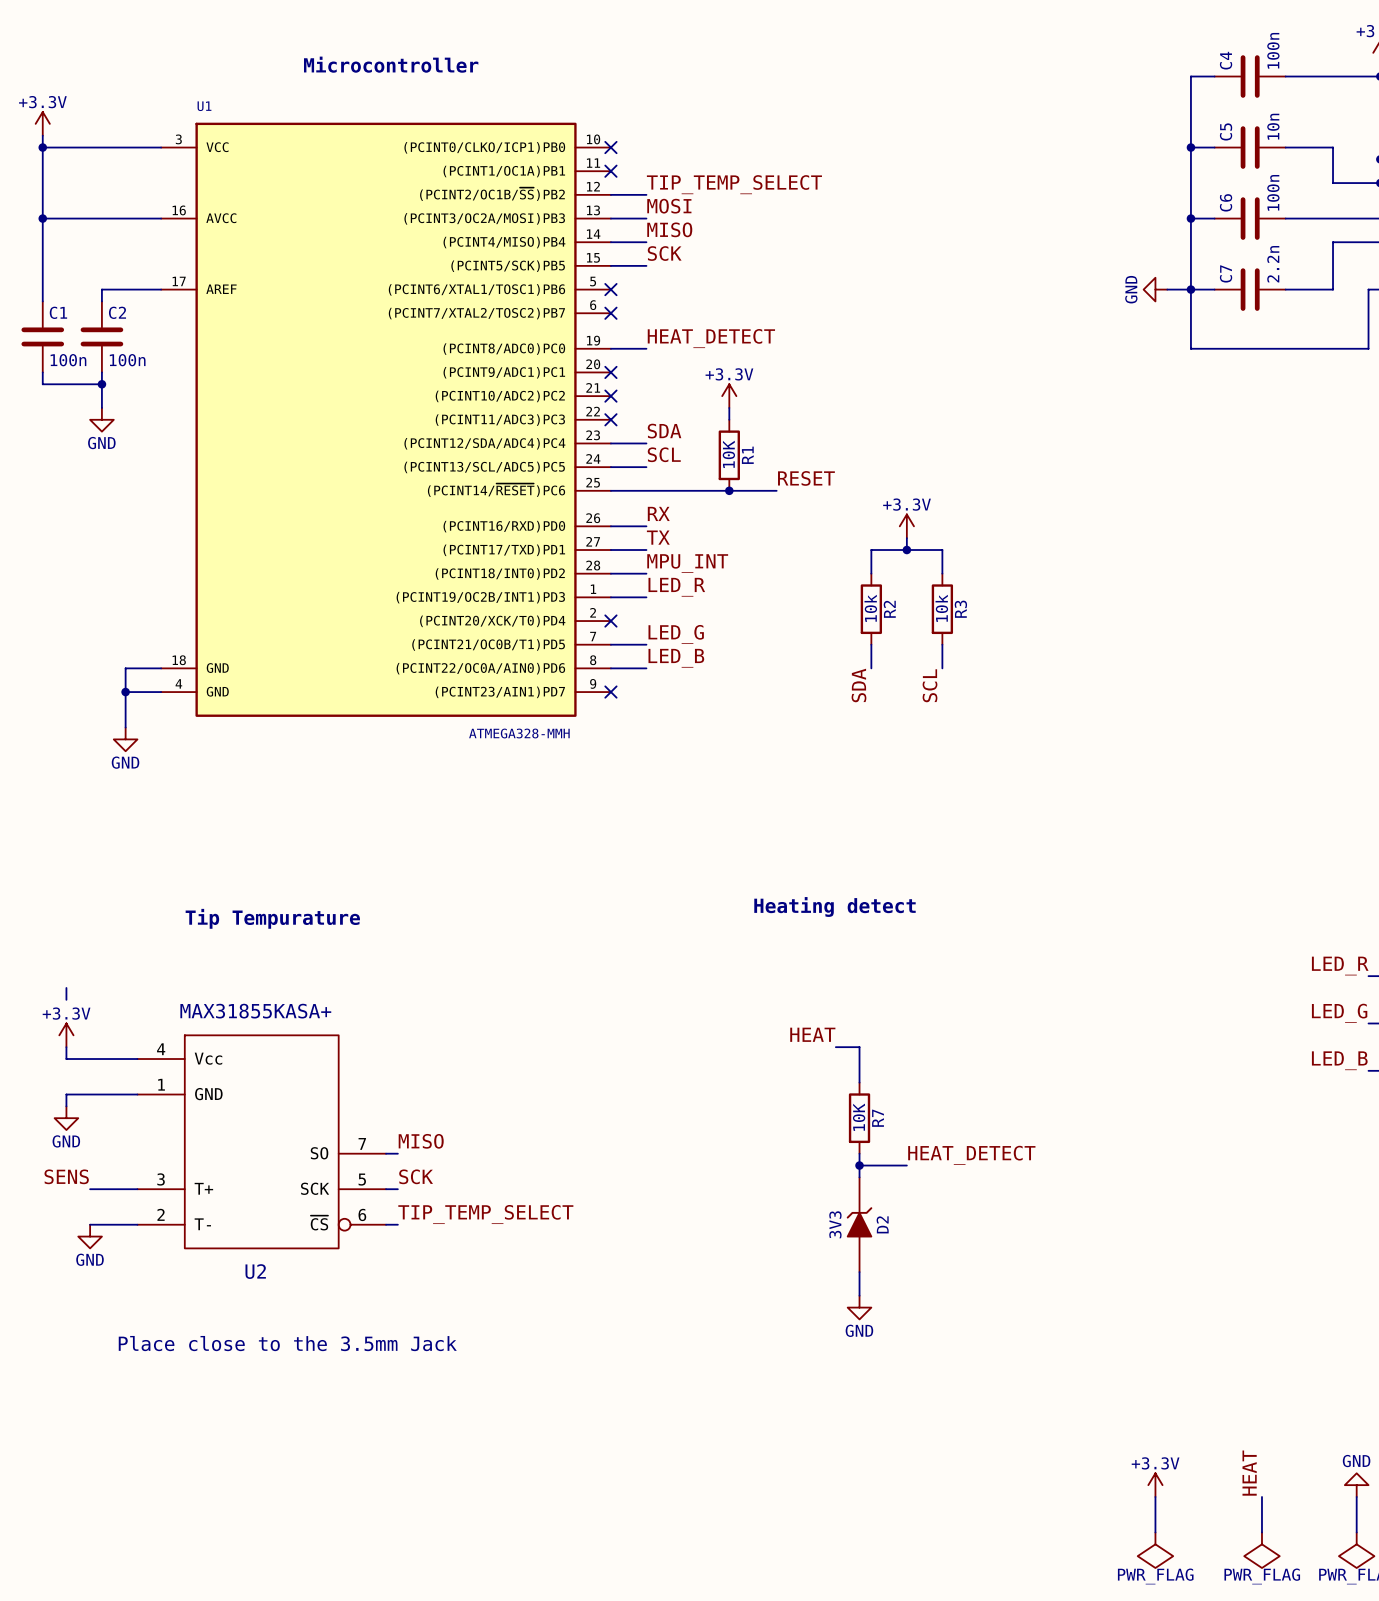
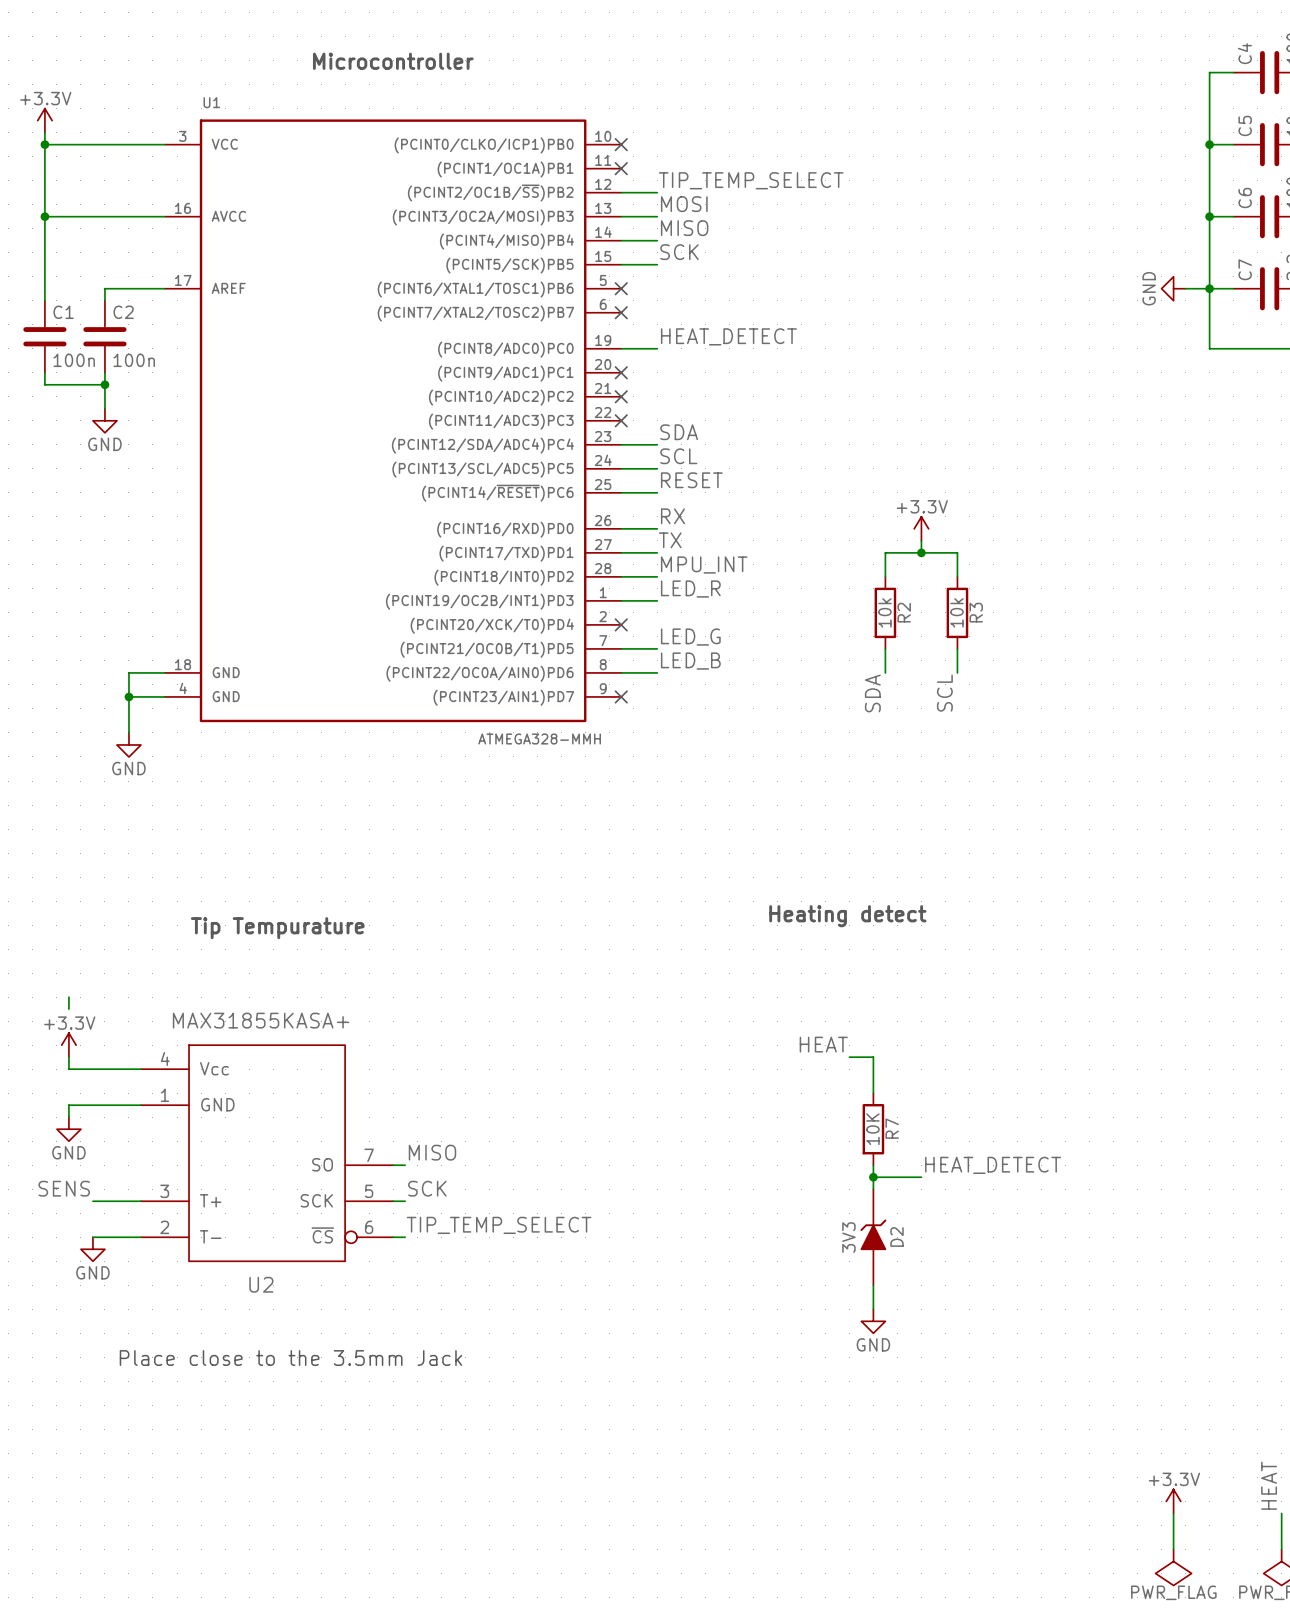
power symbol: +3.3V (729, 396) -> none
wire: (729, 407) (729, 419) -> none
R1: 10K (729, 455) -> none
label position: RESET (806, 478) -> RESET (691, 480)
wire: (646, 490) (776, 490) -> none
junction: (729, 490) -> none

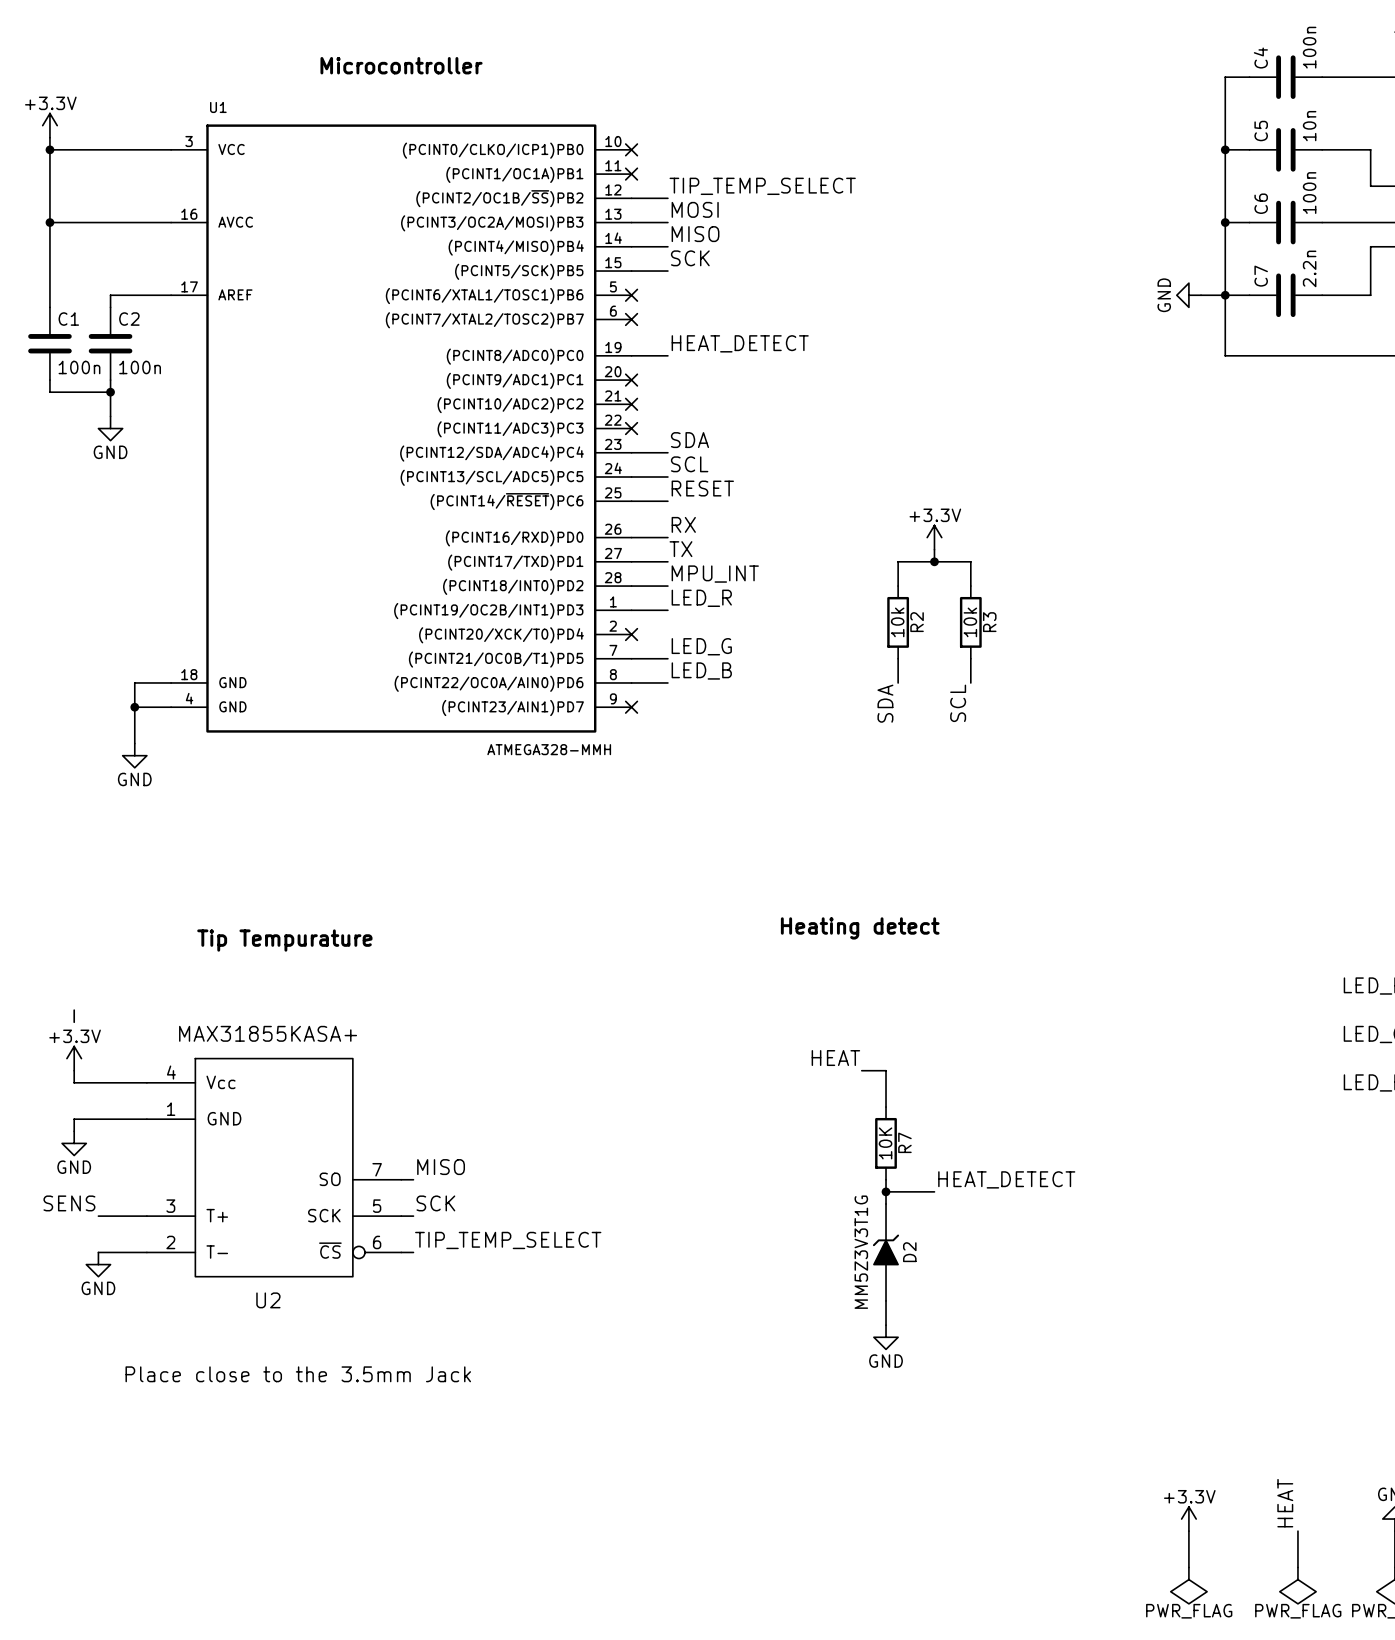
D2 value: 3V3 (848, 1237) -> MM5Z3V3T1G (861, 1252)

